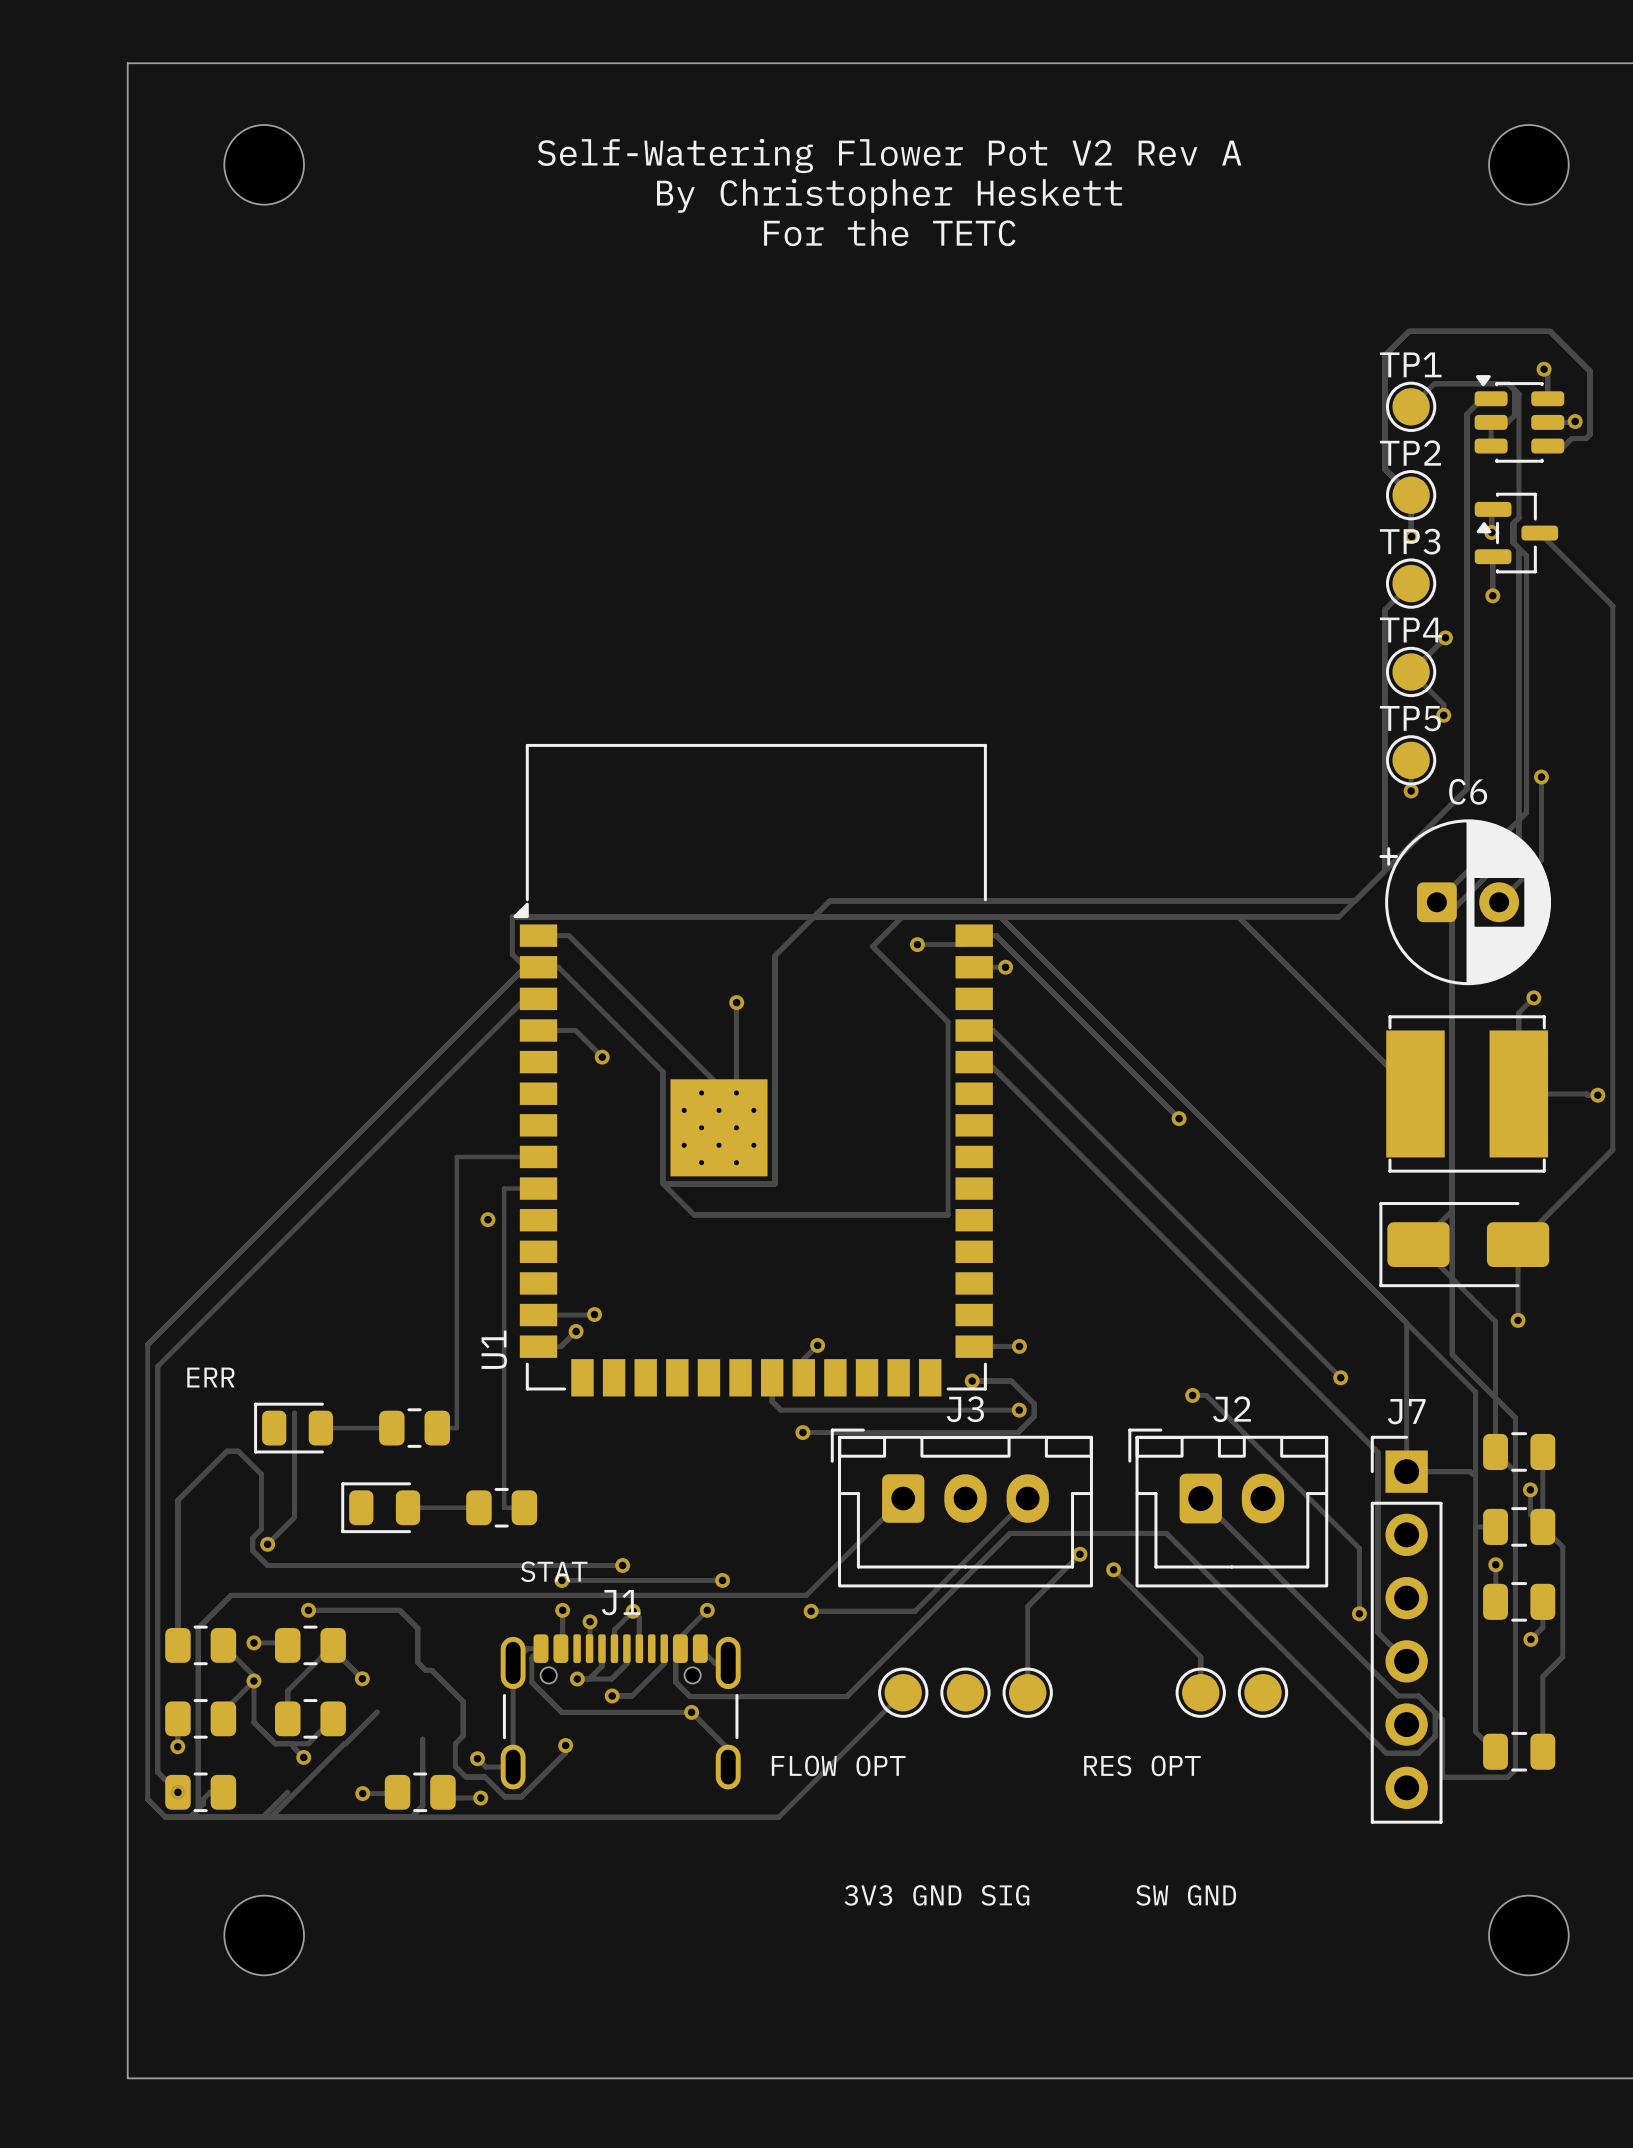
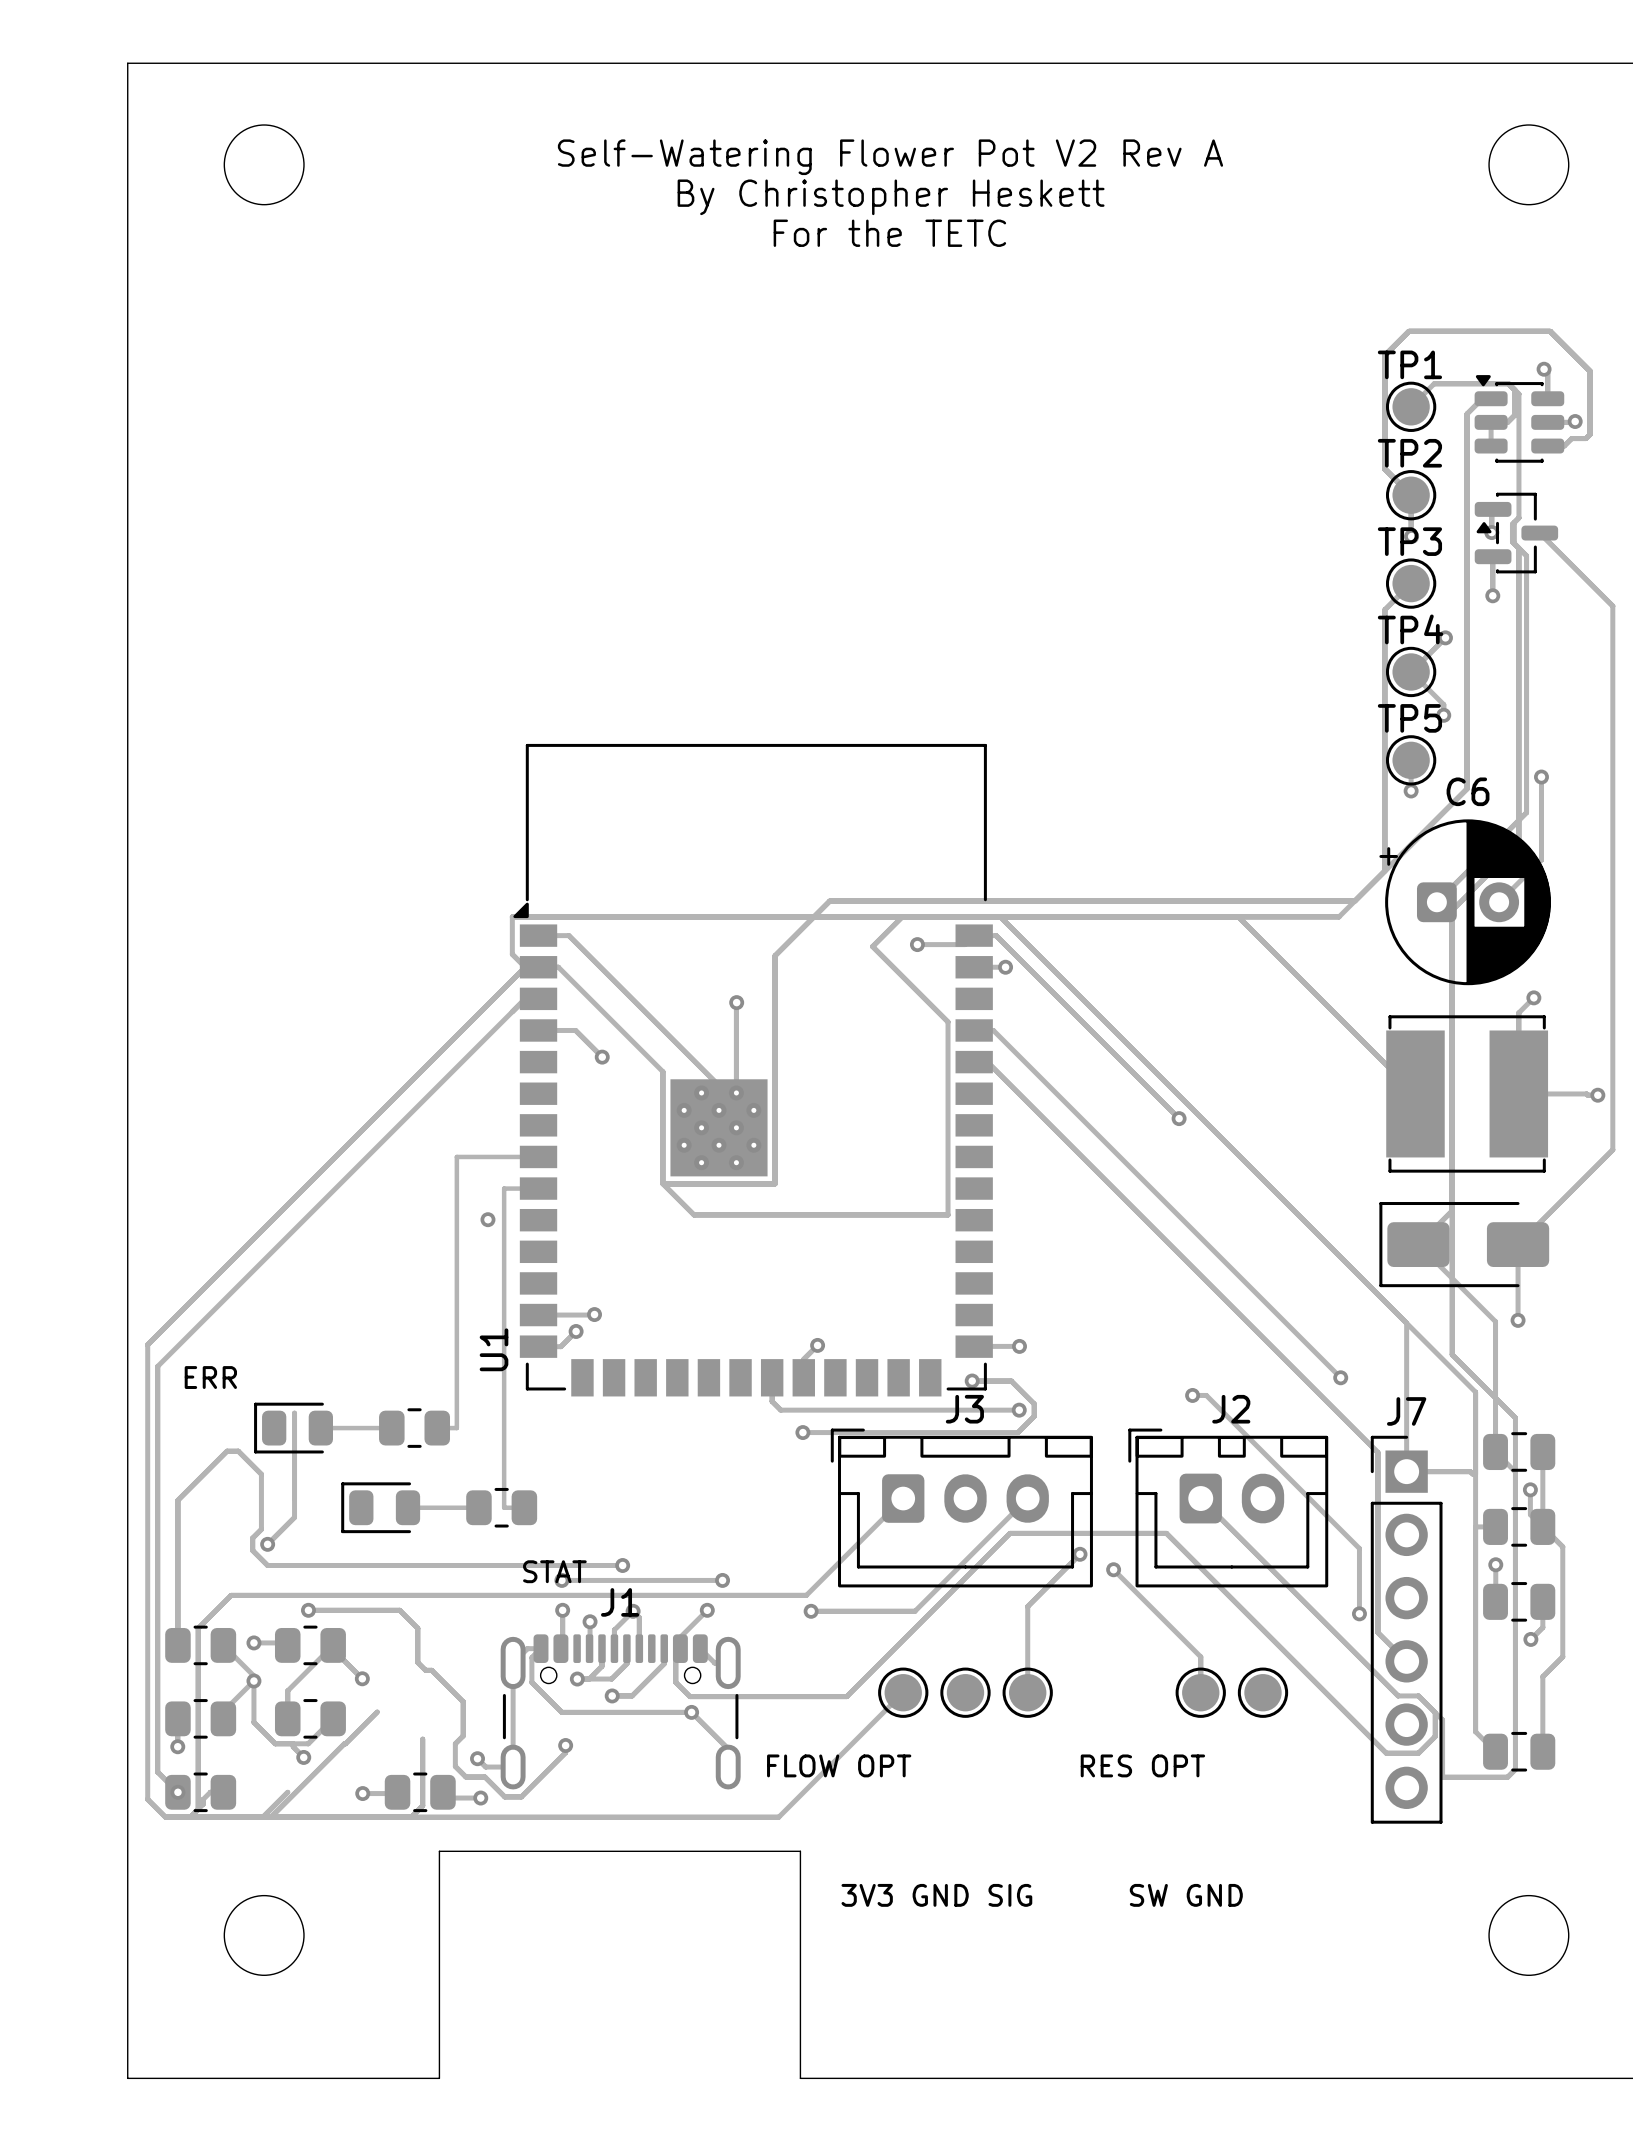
board edge: (439, 2078) (800, 2078) -> (439, 2078) (439, 1851) (800, 1851) (800, 2078)

